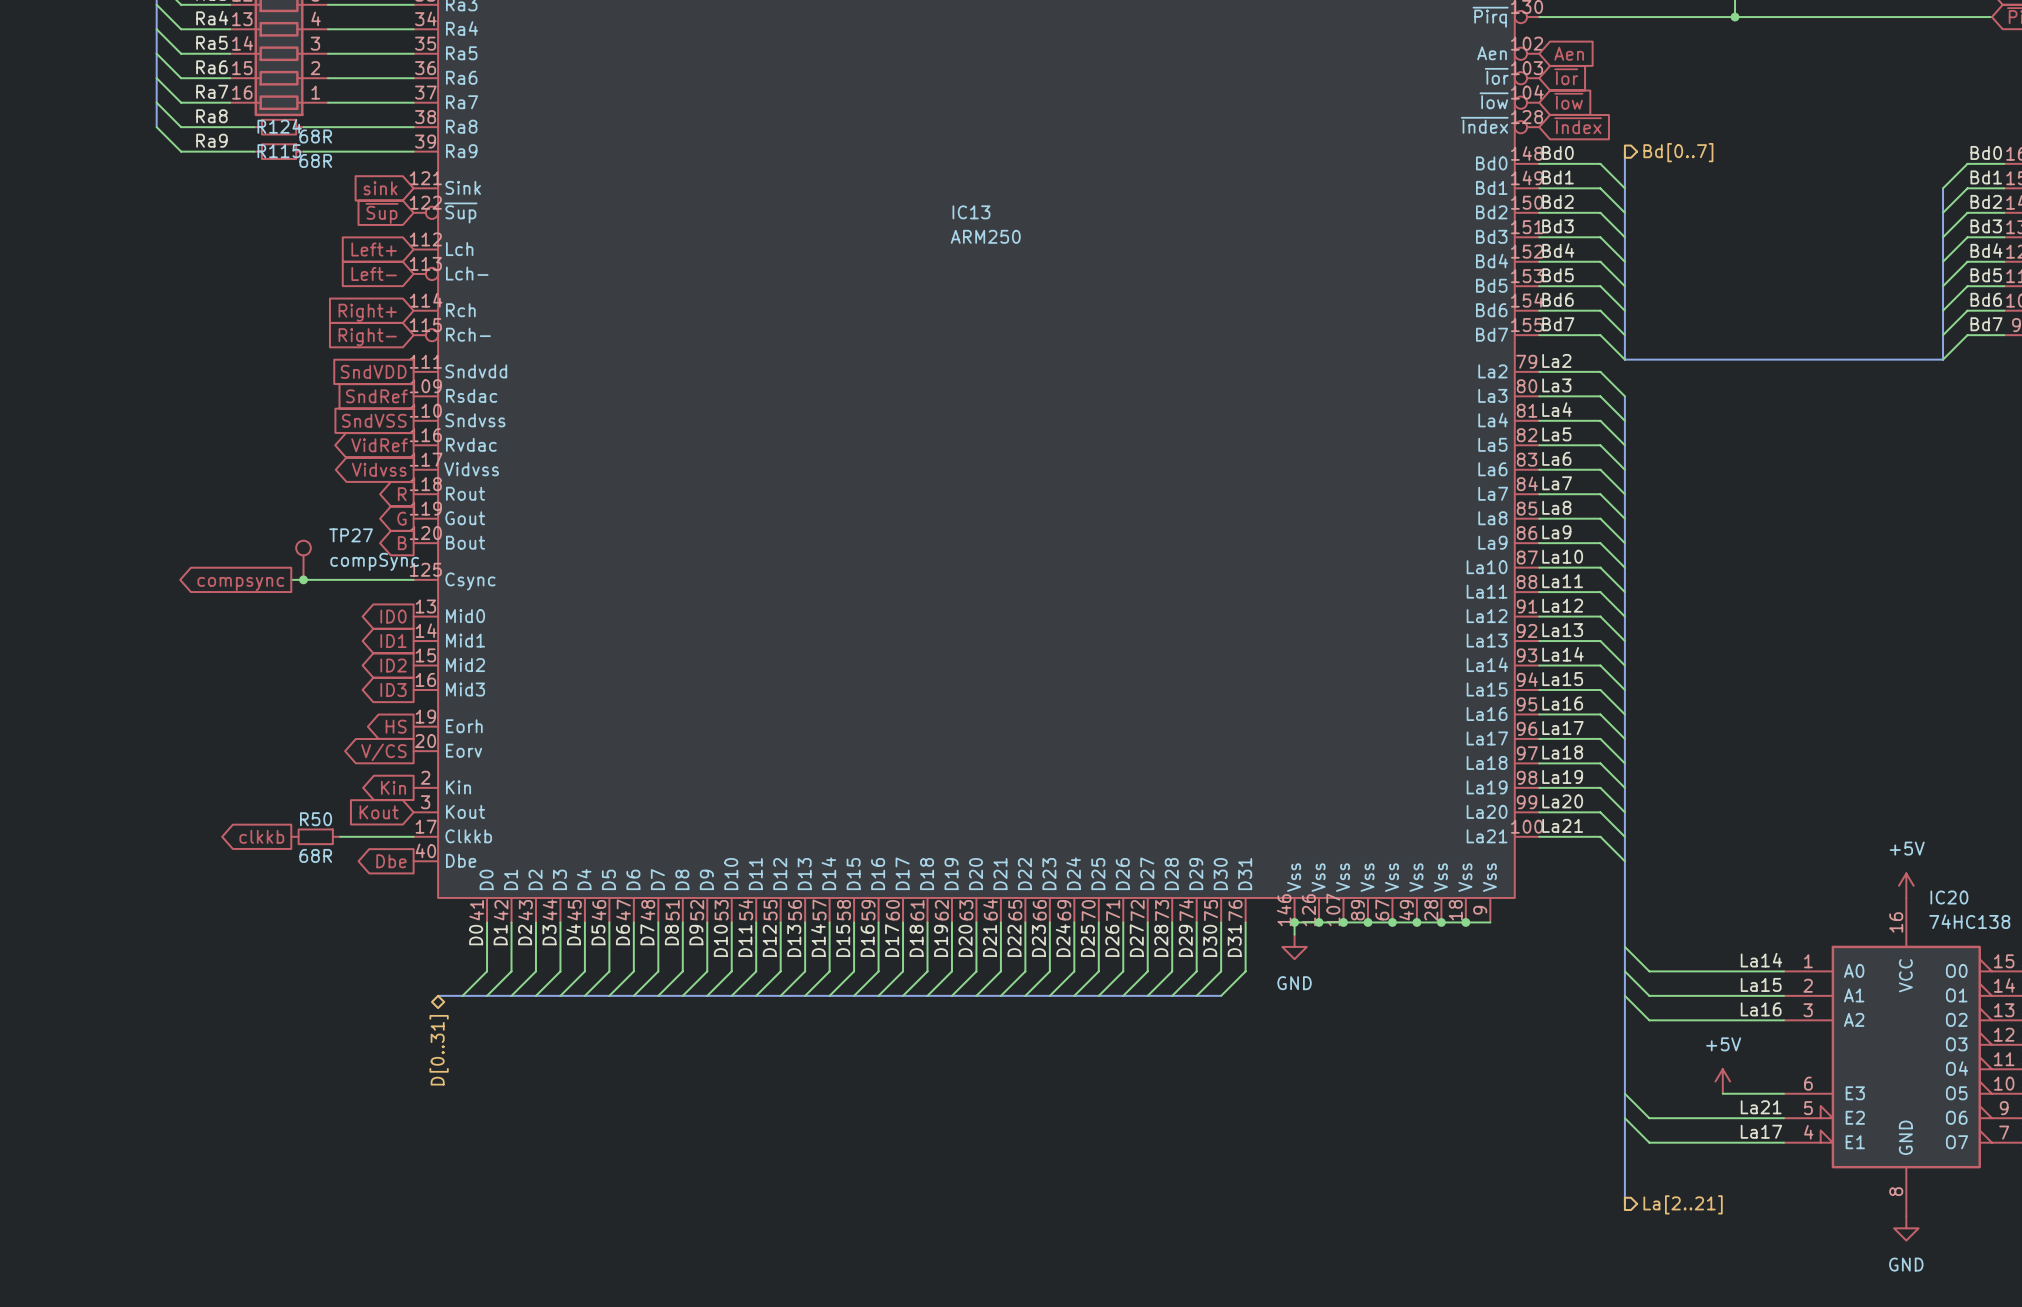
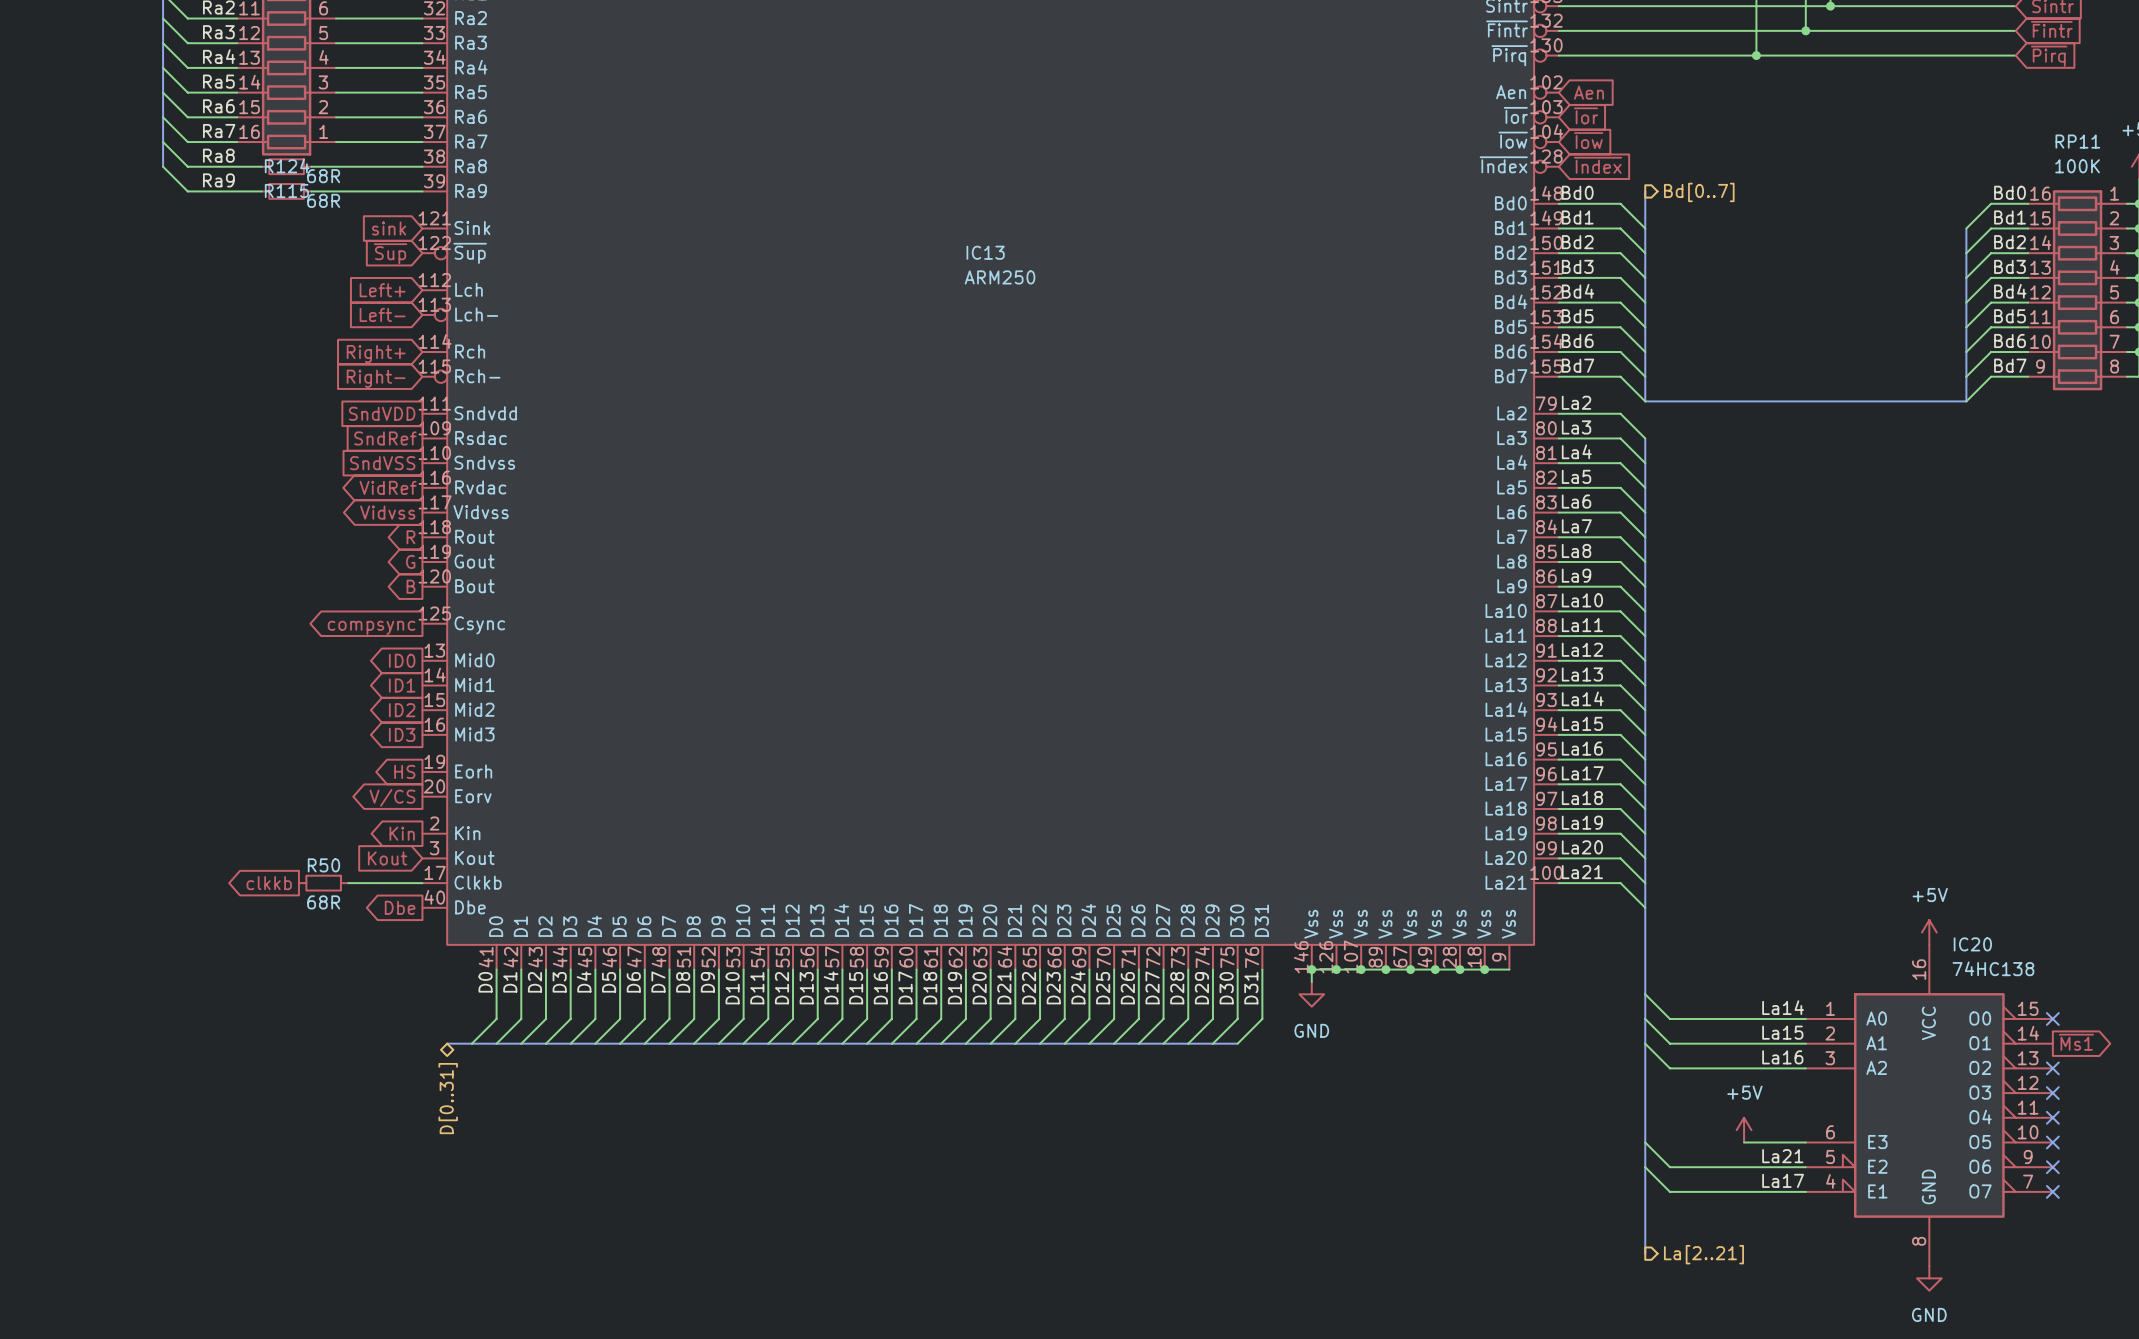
TP27: compSync (303, 560) -> none
wire: (291, 579) (413, 579) -> none
junction: (303, 579) -> none
global label position: compsync (240, 583) -> compsync (371, 627)

